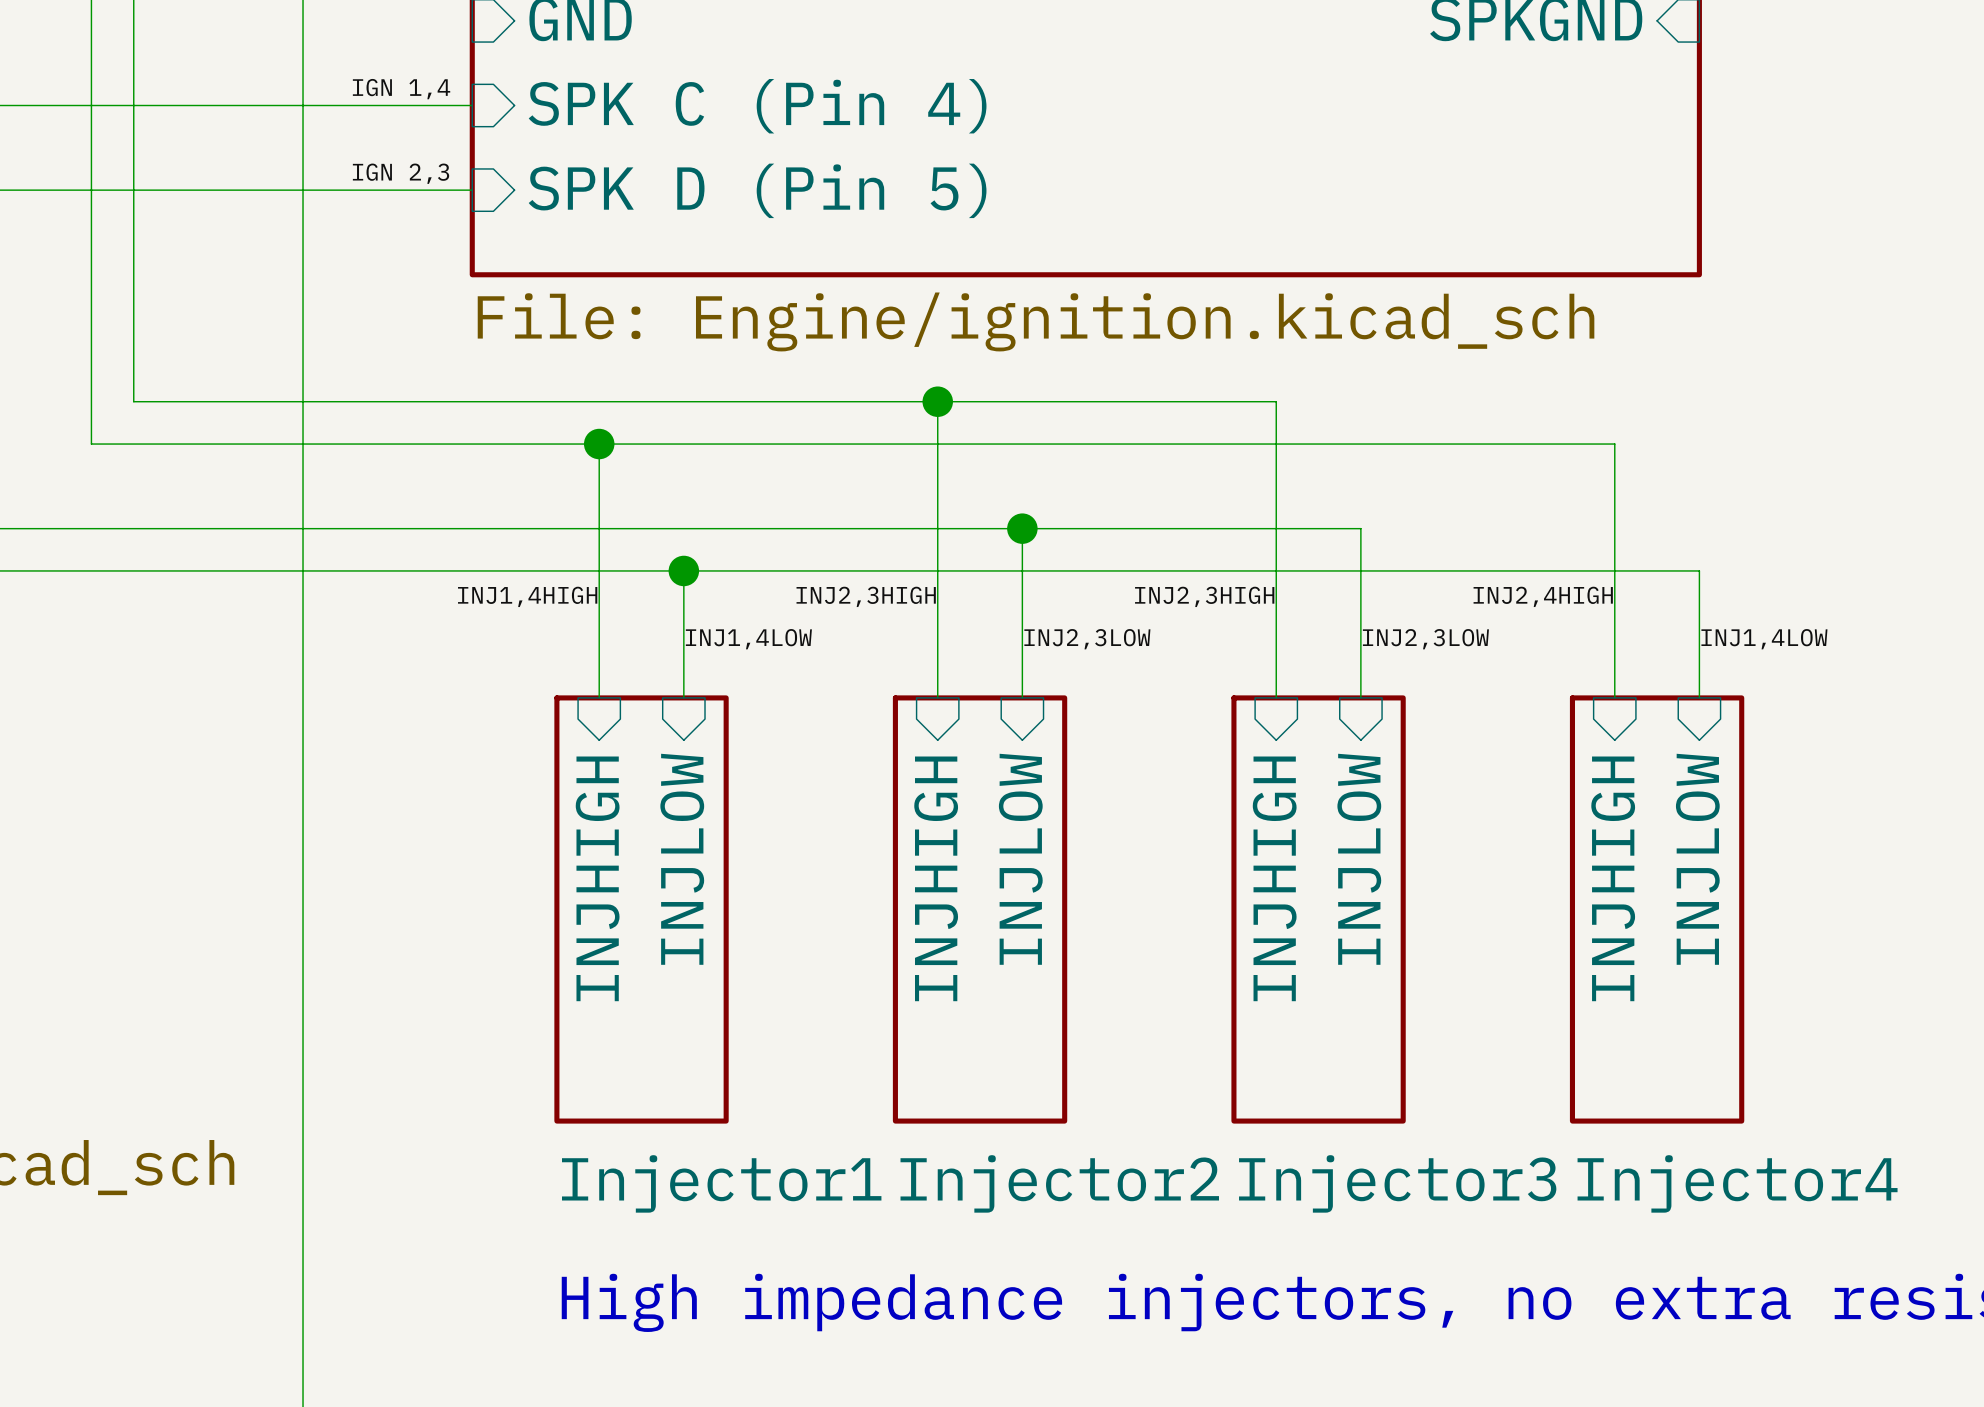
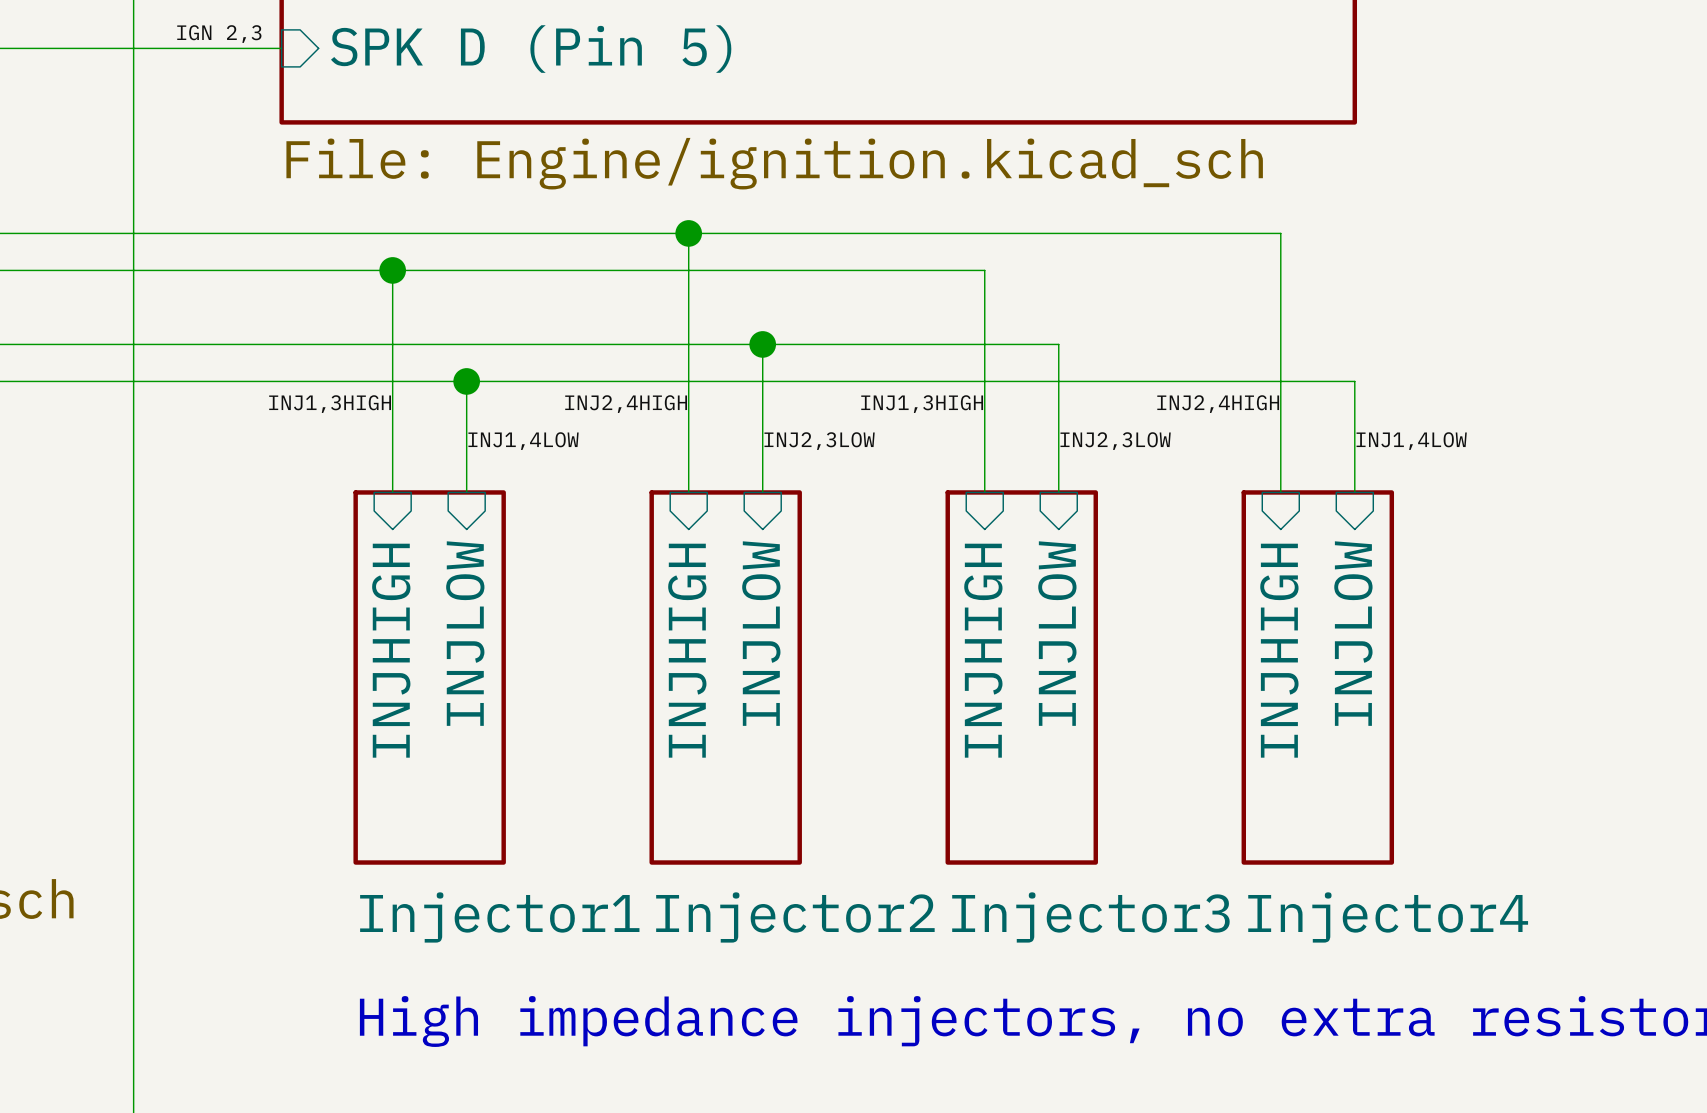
wire: (1276, 401) (1276, 444) (1614, 444) -> (984, 233) (1280, 233) (1280, 270)
label: INJ1,4HIGH (527, 596) -> INJ1,3HIGH (330, 404)
label: INJ2,3HIGH (866, 596) -> INJ2,4HIGH (626, 404)
label: INJ2,3HIGH (1204, 596) -> INJ1,3HIGH (922, 404)

